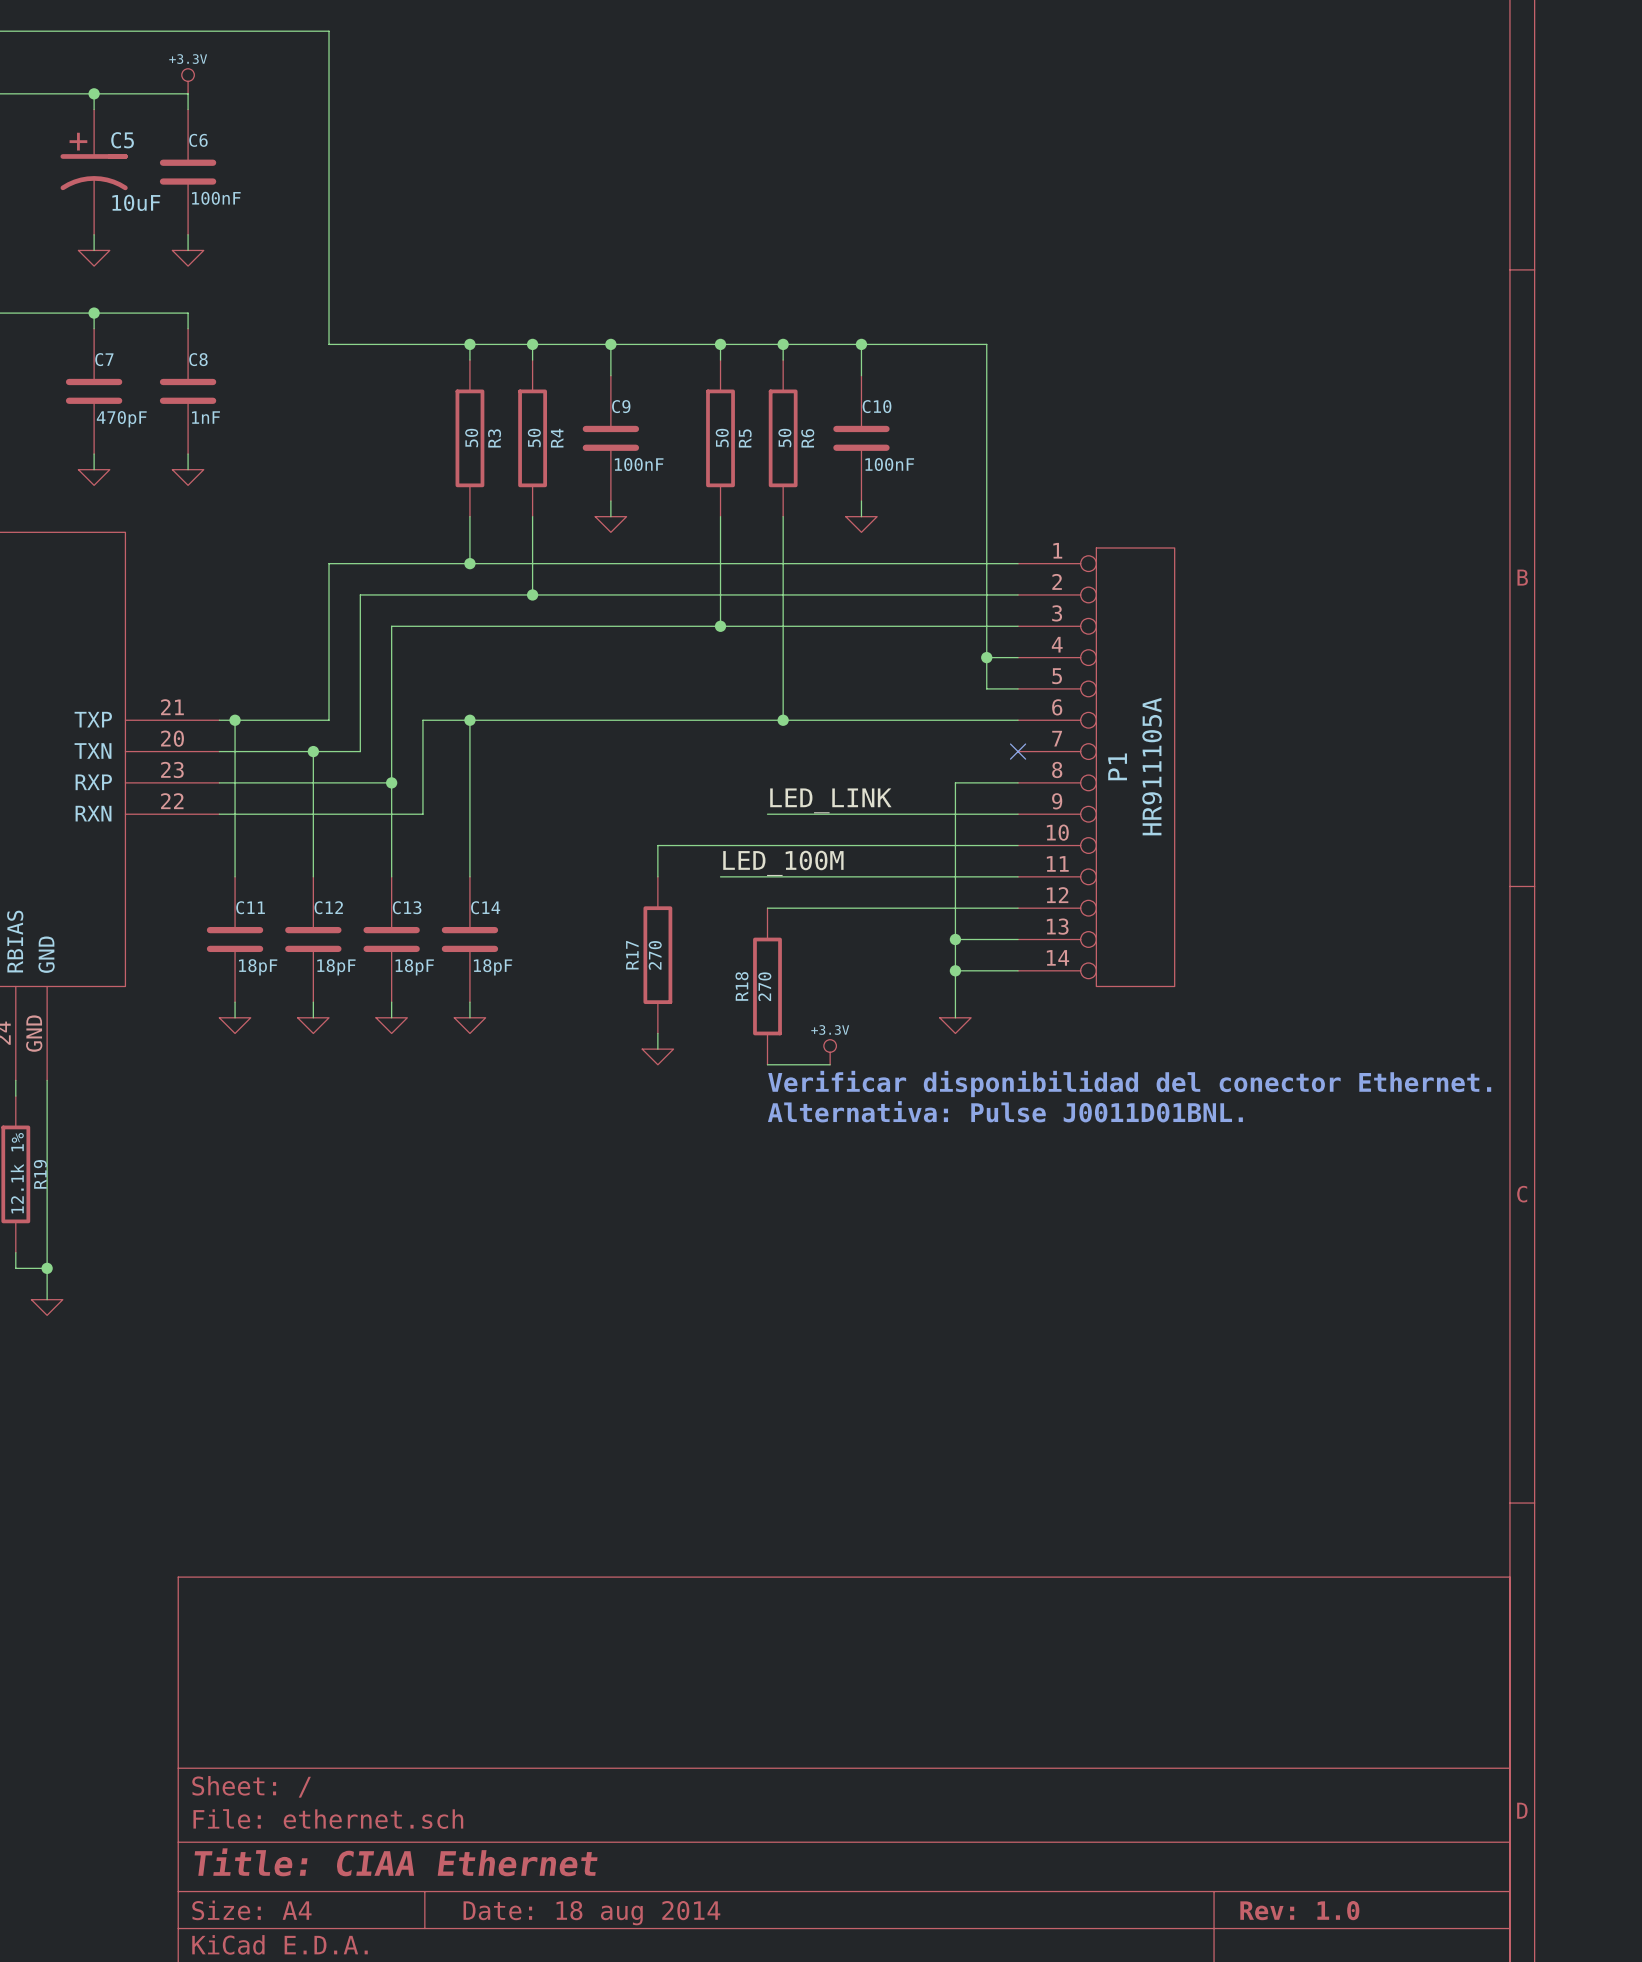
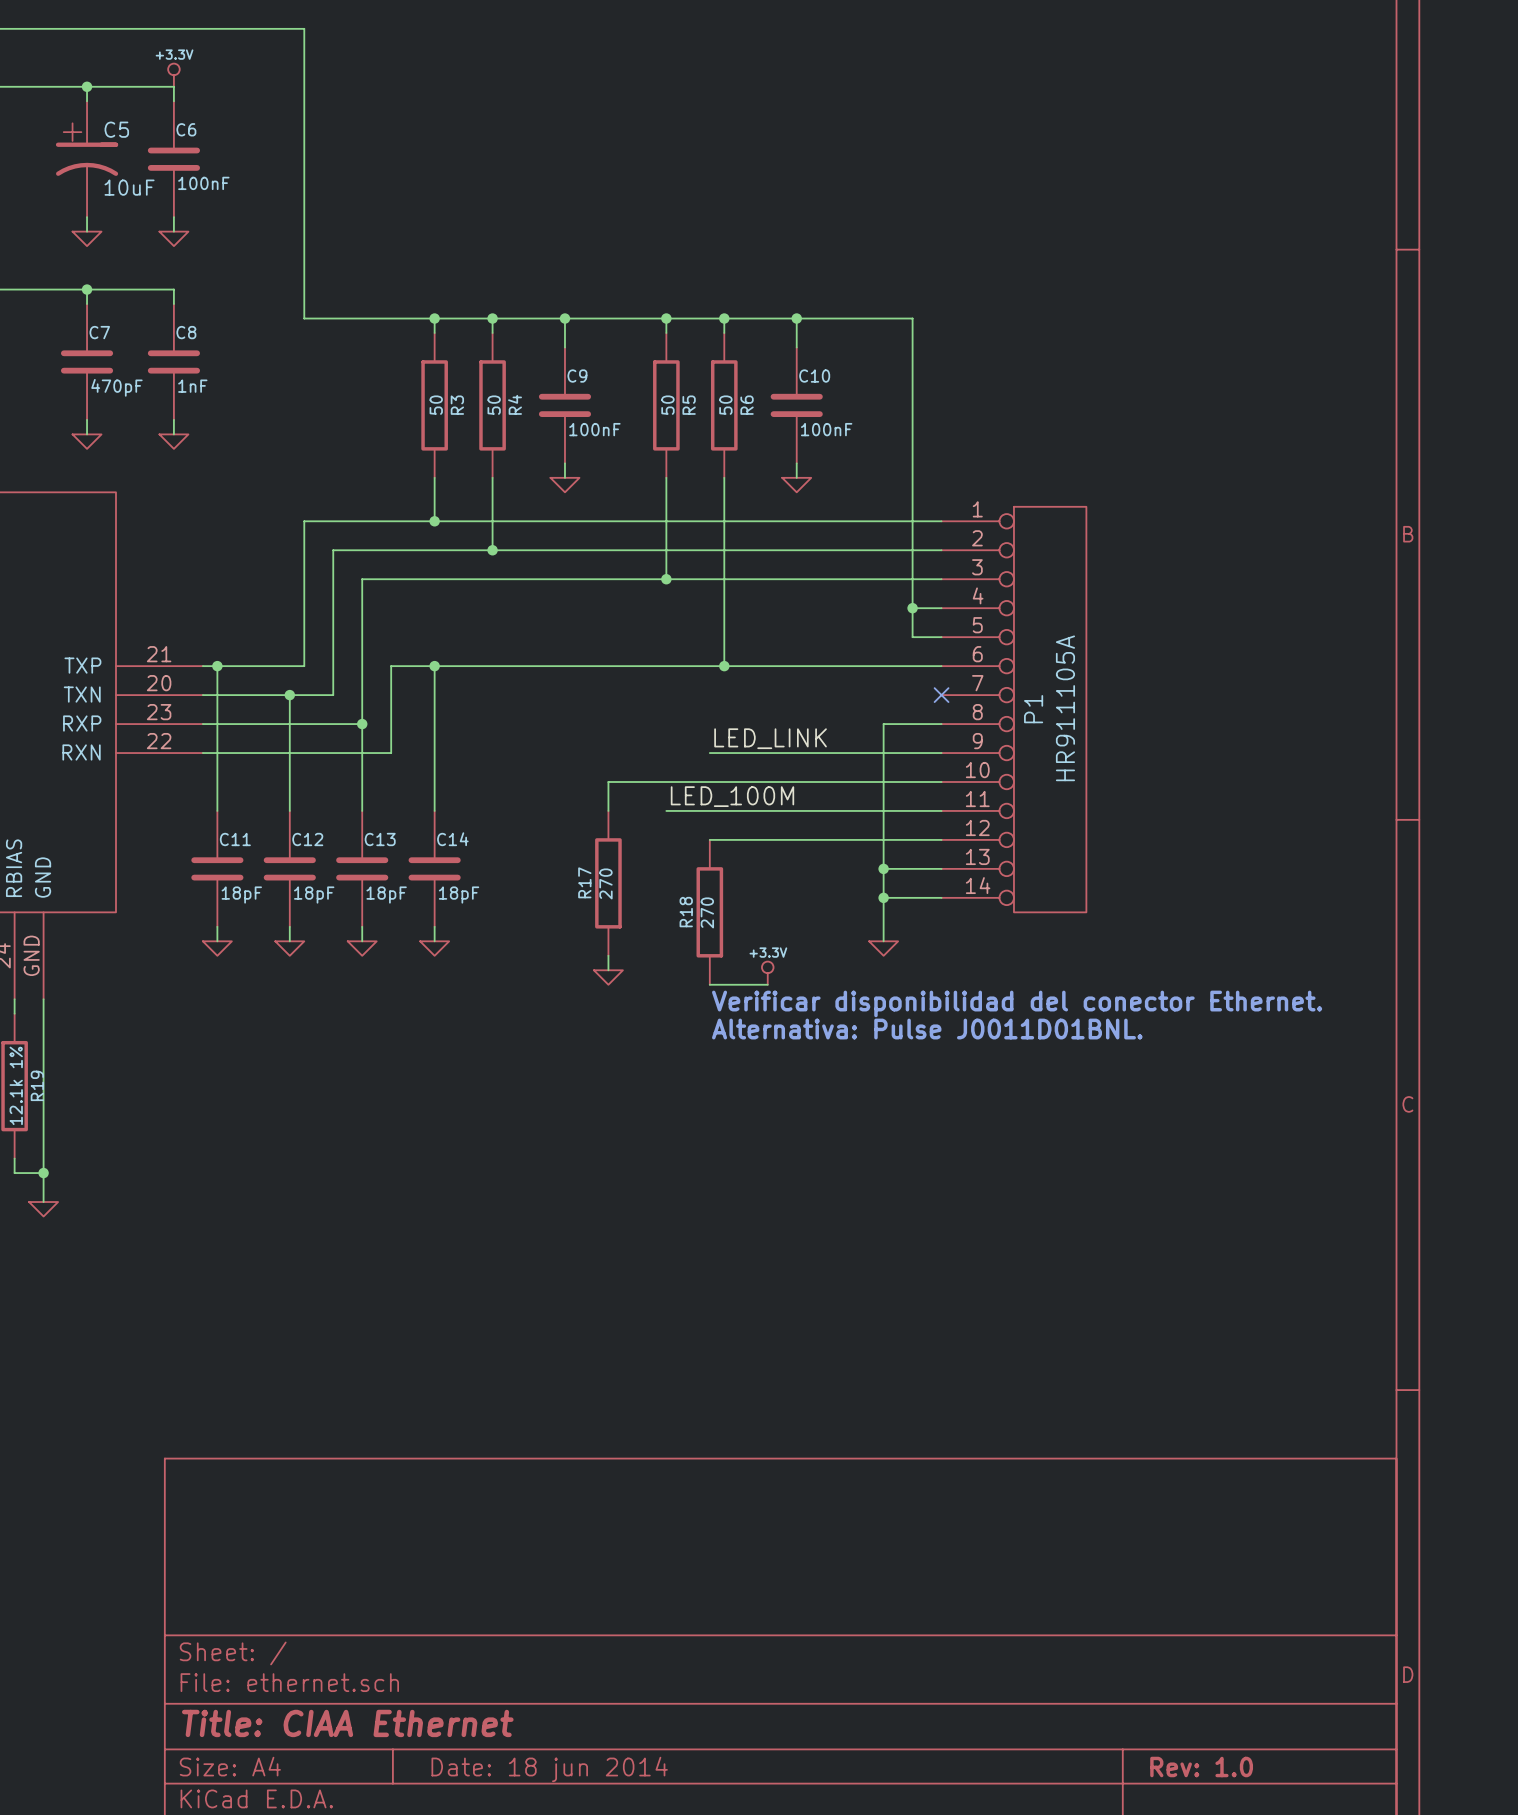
title block: Date: 18 aug 2014 (591, 1913) -> Date: 18 jun 2014 (549, 1769)

